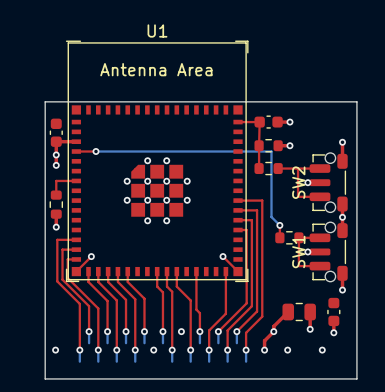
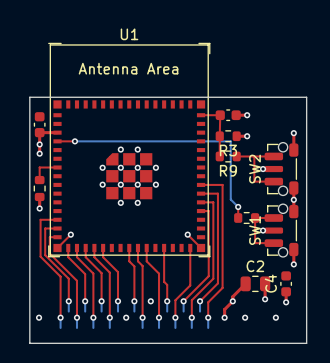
R3 name: none -> R3 (228, 150)
R9 name: none -> R9 (228, 170)
C2 name: none -> C2 (255, 266)
C4 name: none -> C4 (270, 283)

